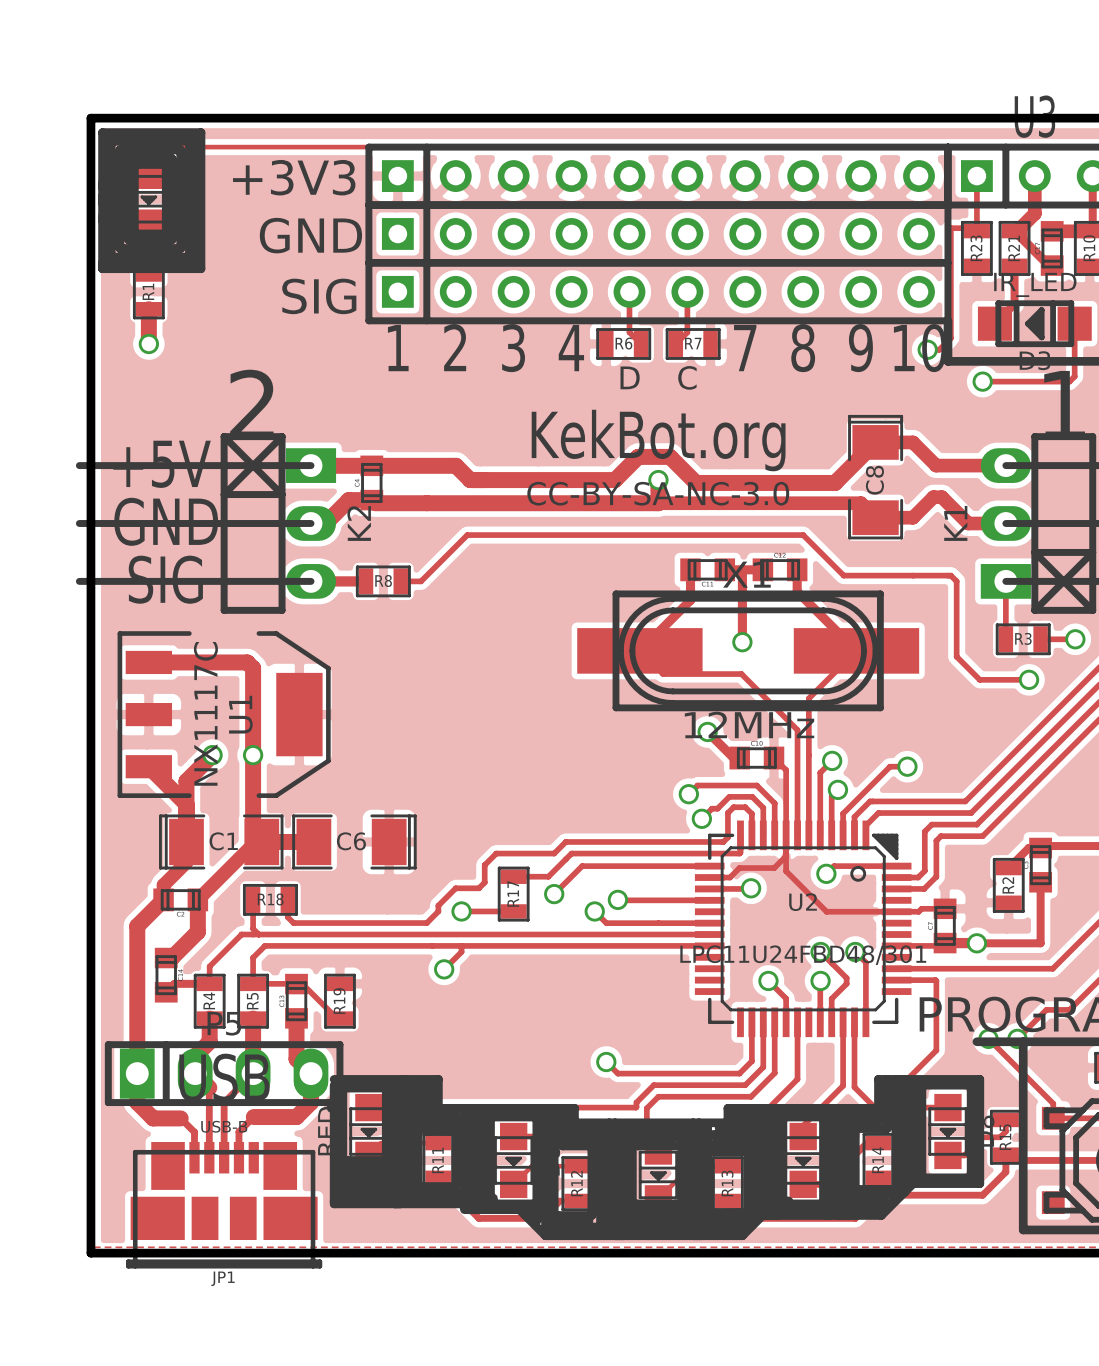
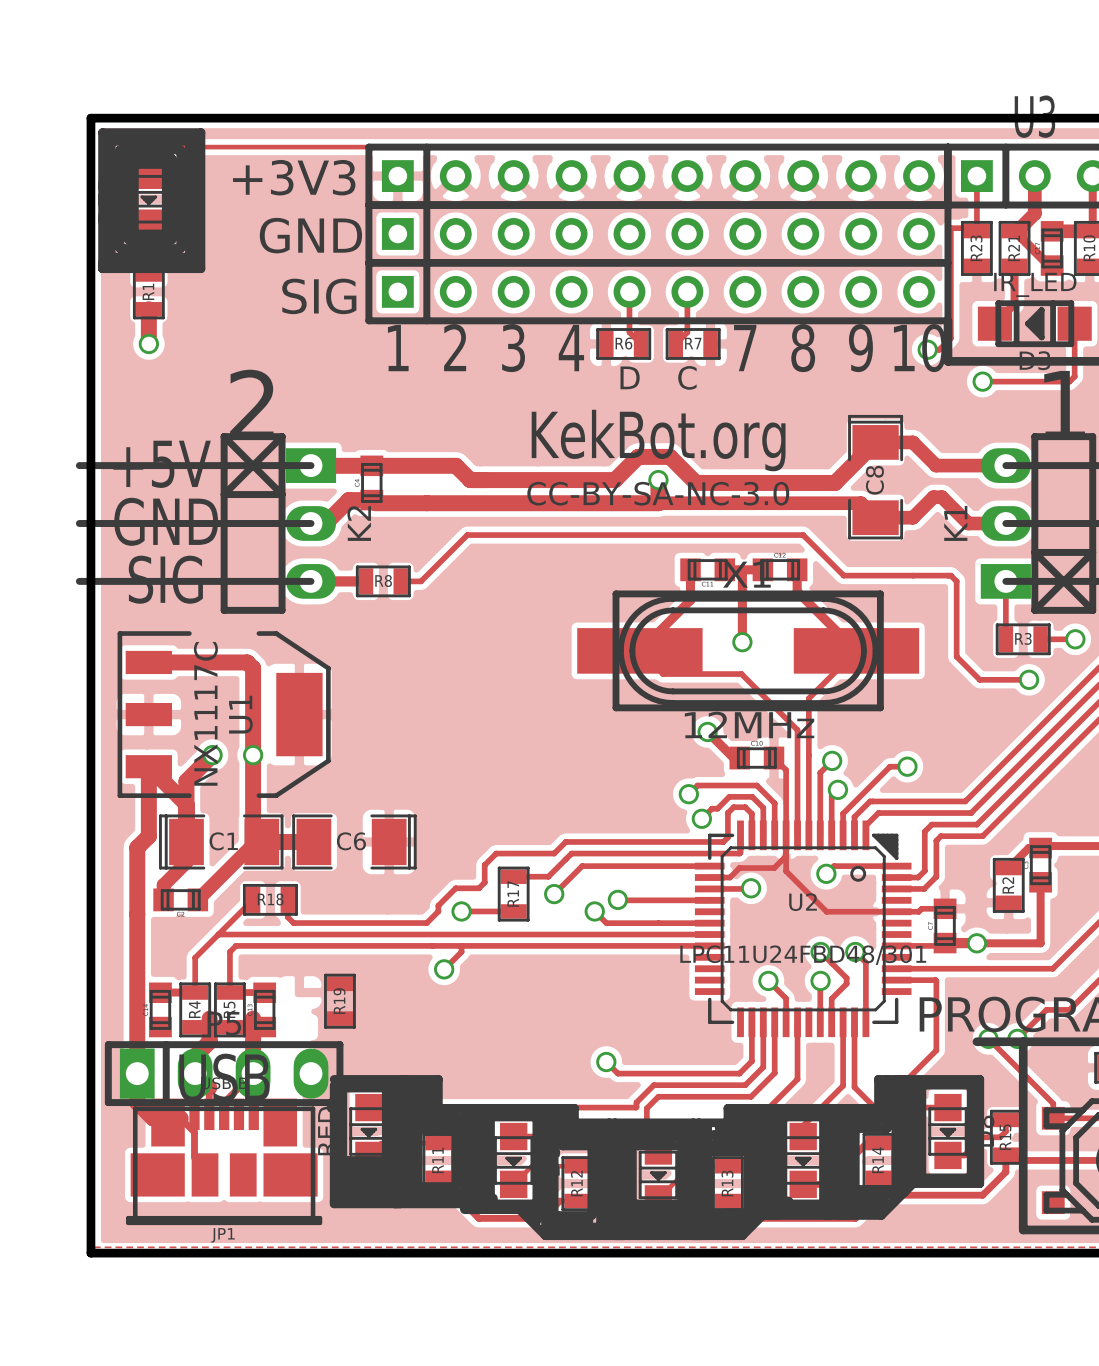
track: (163, 899) (137, 926) -> (148, 766) (148, 836) (137, 847) (137, 926)
track: (197, 899) (197, 931) (171, 958) (166, 958) -> none
track: (253, 899) (253, 928) (258, 934) -> (253, 899) (195, 957) (195, 992) (160, 992)
track: (241, 934) (209, 966) (209, 983) (174, 983) (166, 992) -> (241, 934) (218, 934)
track: (264, 945) (253, 957) (253, 983) (296, 983) -> (264, 945) (236, 945) (229, 952) (229, 992) (264, 992)
part rotation: 0° (166, 975) -> 180° (160, 1009)
part position: (166, 975) -> (160, 1009)
track: (296, 984) (302, 984) (337, 1018) (339, 1018) -> none
R4 position: (209, 1001) -> (195, 1009)
R5 position: (253, 1001) -> (229, 1009)
part position: (296, 1001) -> (264, 1009)
track: (296, 1018) (296, 1059) (311, 1073) (311, 1102) (296, 1117) (253, 1117) (238, 1131) (238, 1157) -> none
track: (209, 1114) (209, 1157) -> none
track: (224, 1114) (224, 1157) -> none
JP1 position: (224, 1205) -> (224, 1161)

